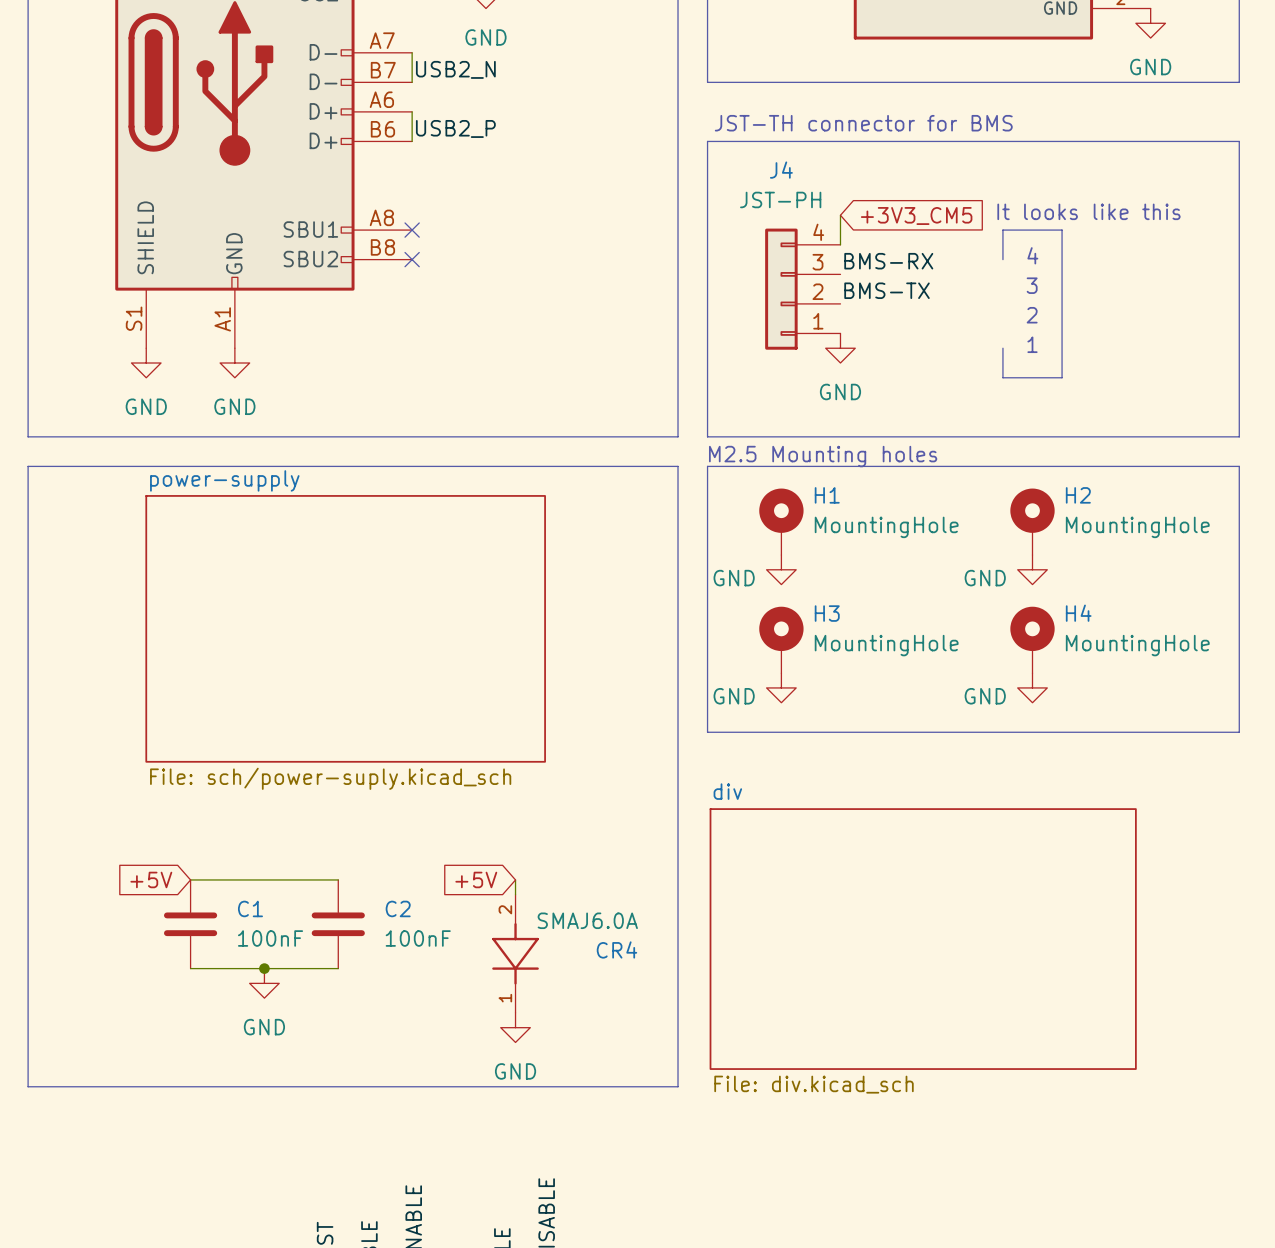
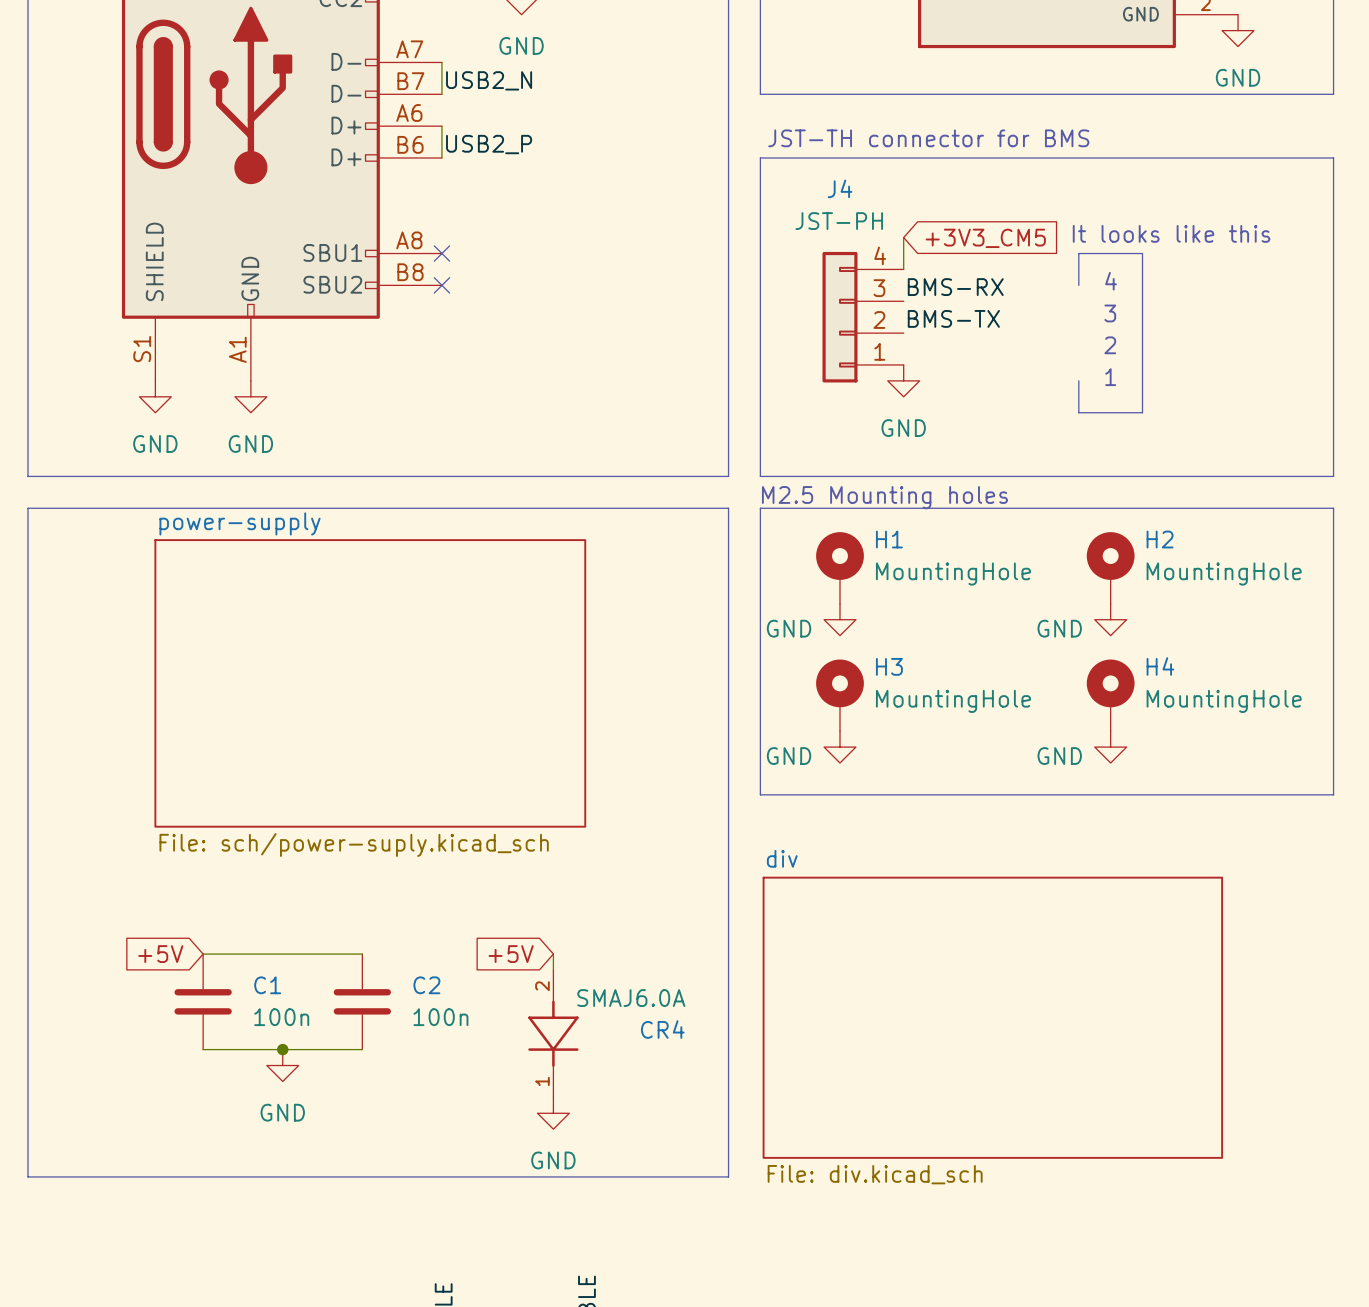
C1 value: 100nF (270, 938) -> 100n (281, 1017)
C2 value: 100nF (418, 938) -> 100n (440, 1017)

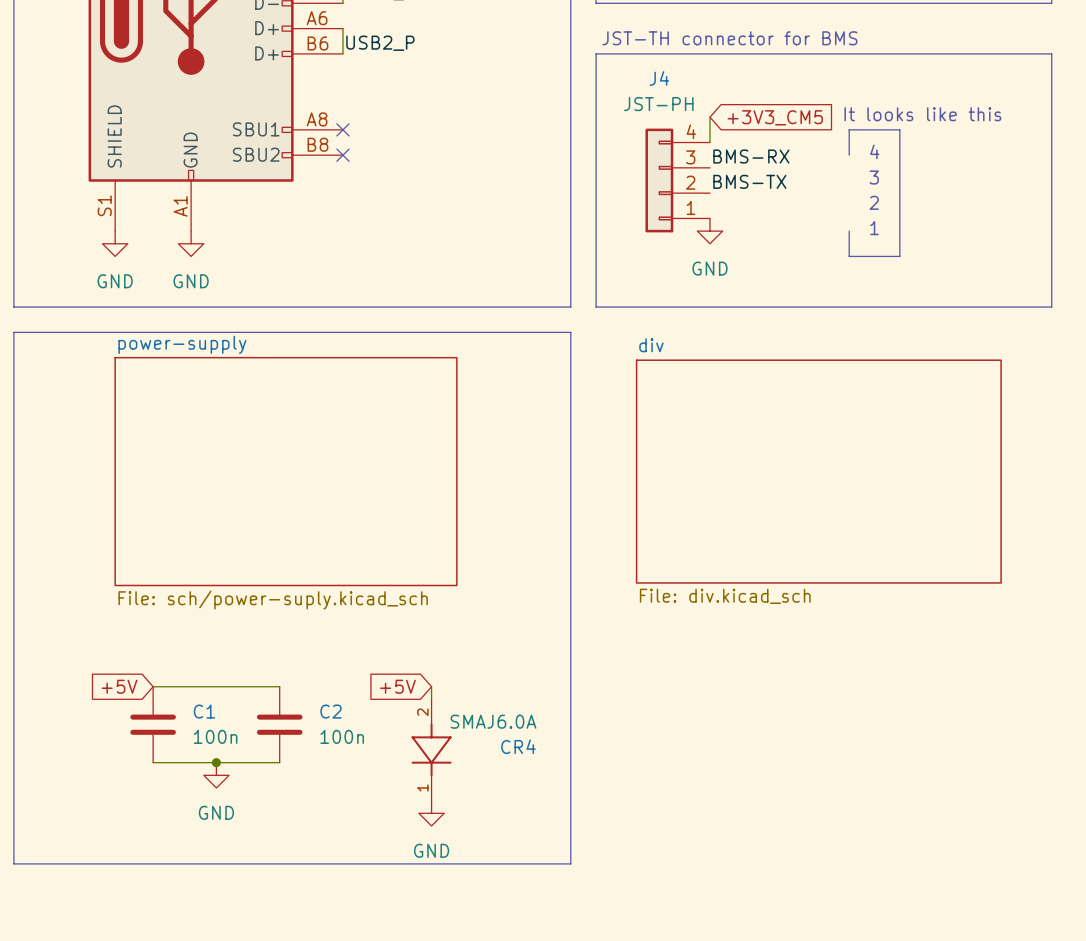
text: M2.5 Mounting holes (884, 497) -> none
line: (760, 508) (1333, 508) (1333, 794) (760, 794) (760, 508) -> none
H1: MountingHole (839, 567) -> none
H2: MountingHole (1110, 567) -> none
power symbol: GND (839, 619) -> none
power symbol: GND (1110, 619) -> none
sheet div: none -> File: div.kicad_sch (818, 471)
H3: MountingHole (839, 695) -> none
H4: MountingHole (1110, 695) -> none
power symbol: GND (839, 747) -> none
power symbol: GND (1110, 747) -> none
sheet div: File: div.kicad_sch (992, 1017) -> none

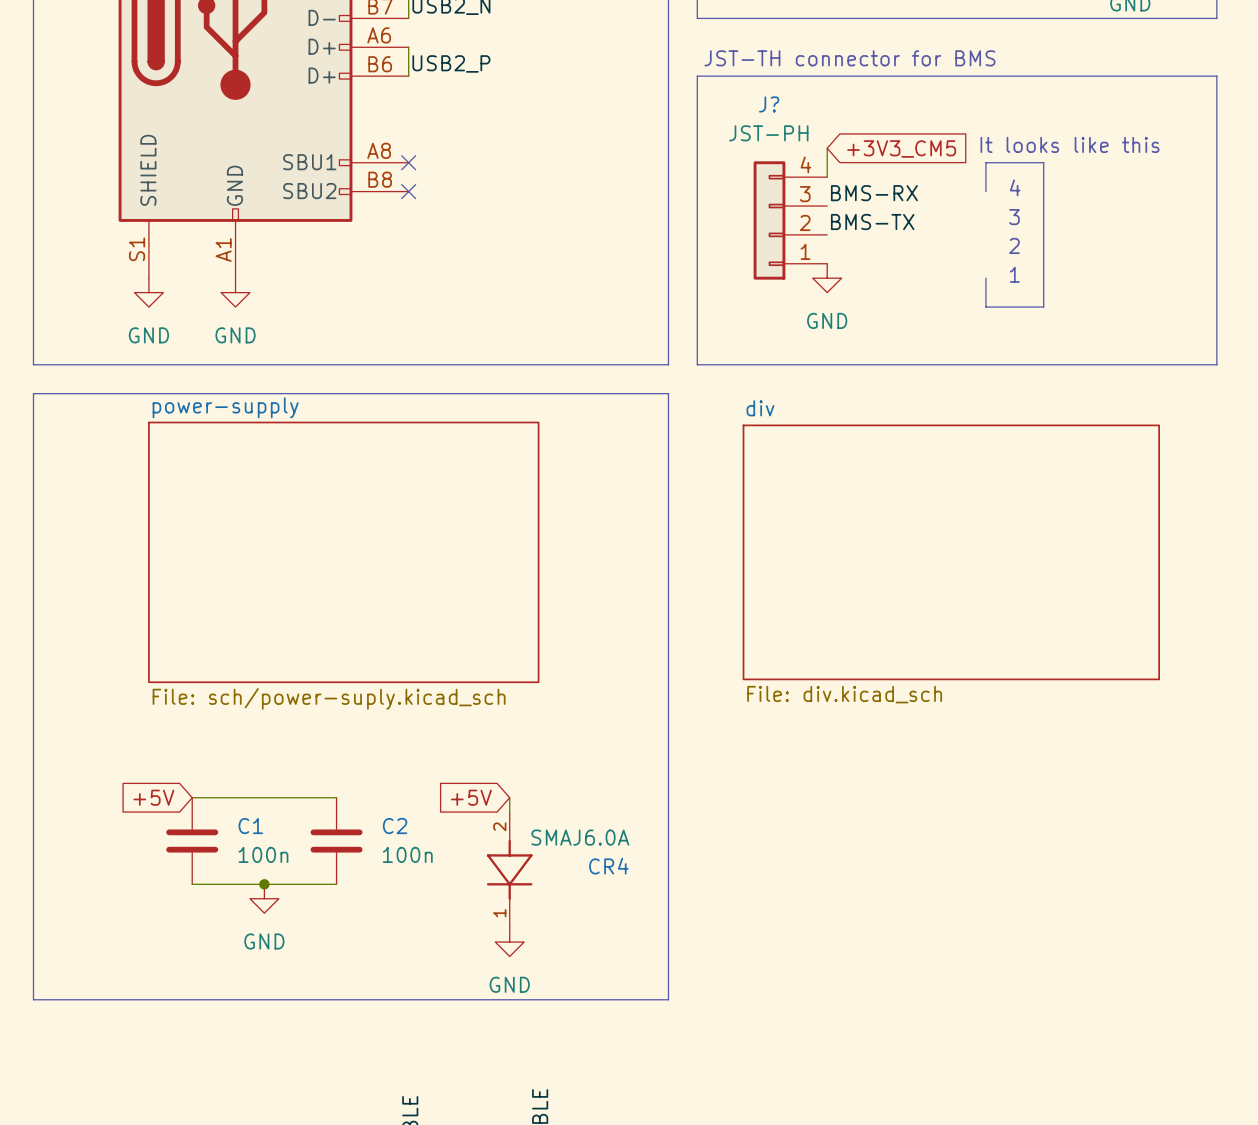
J4 name: J4 (659, 78) -> J? (769, 104)

